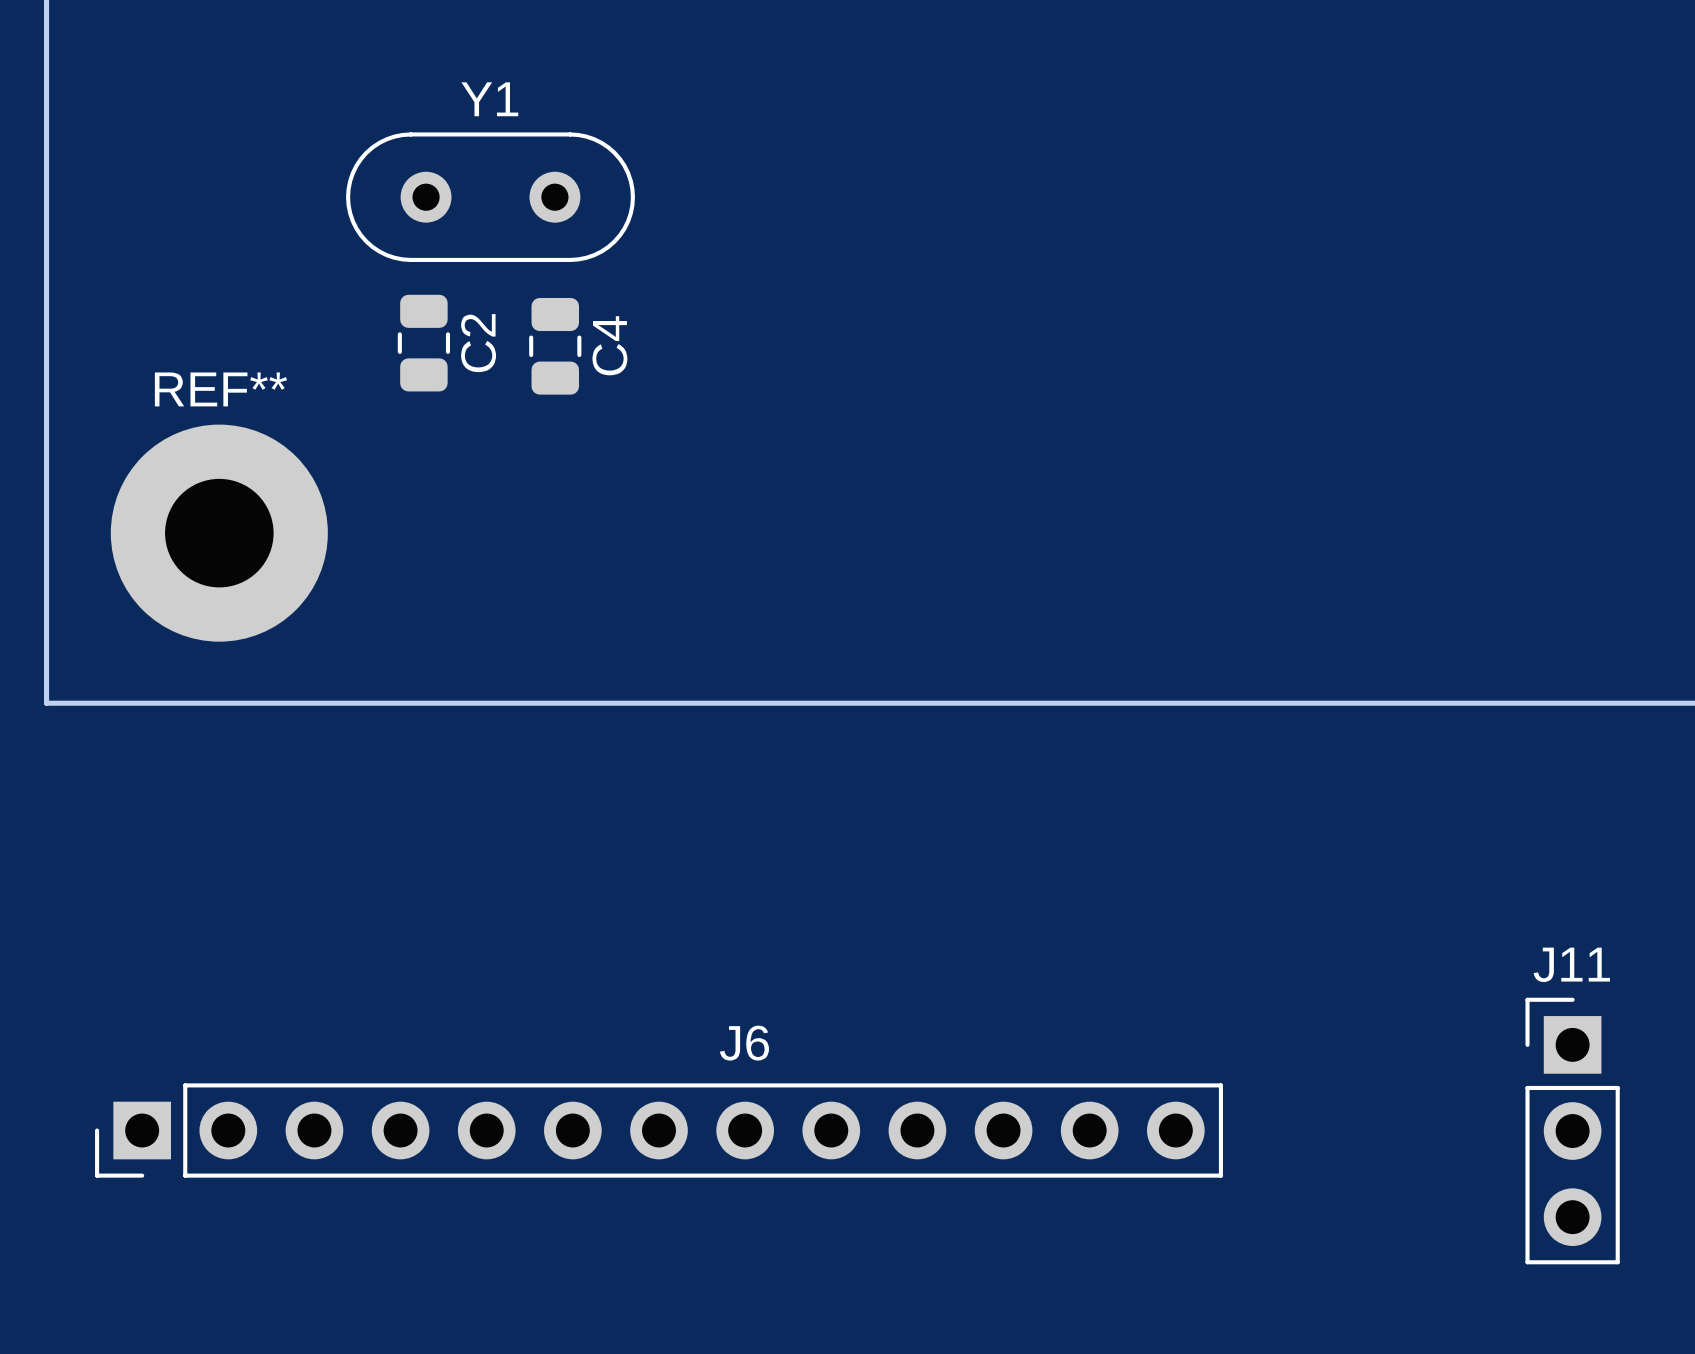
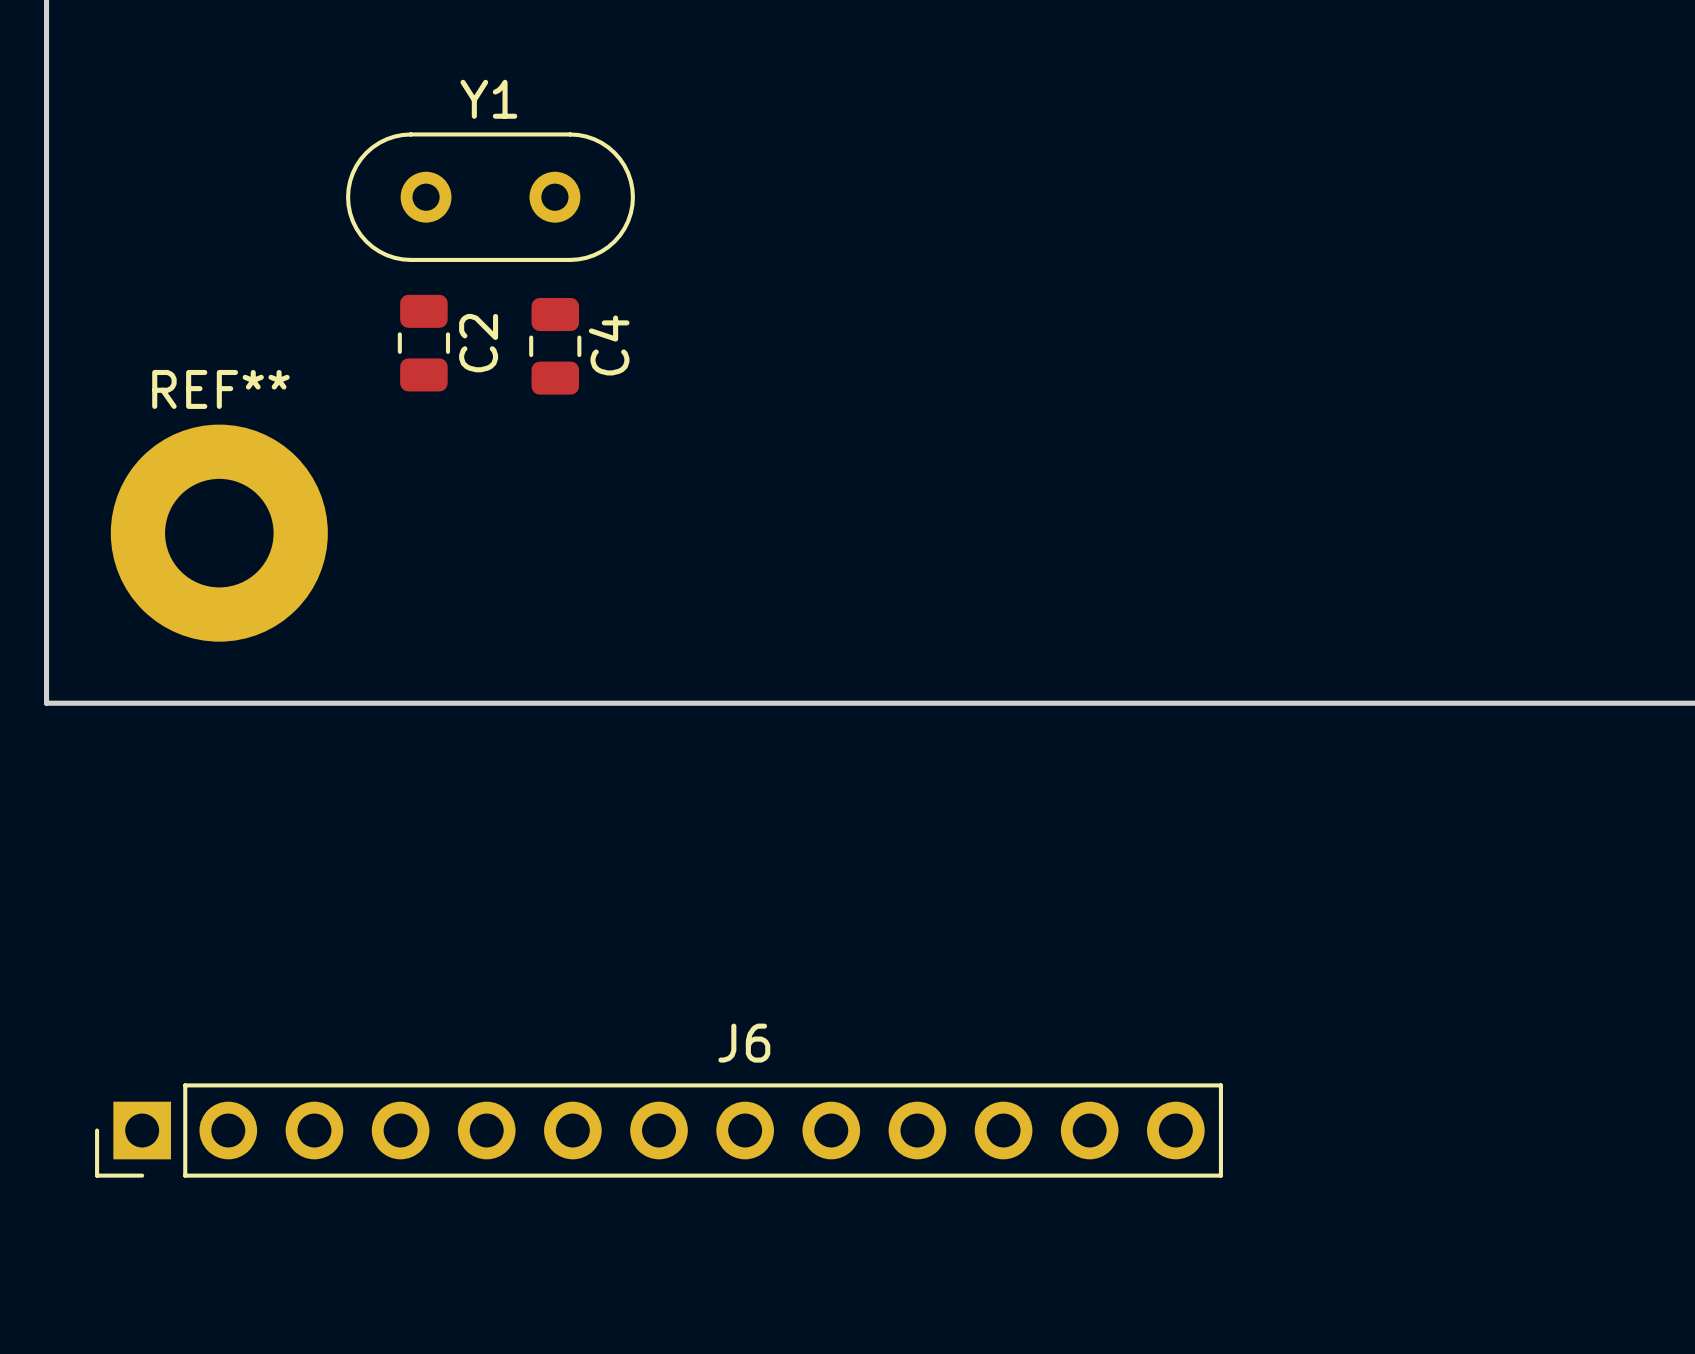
J11: (1572, 1131) -> none

